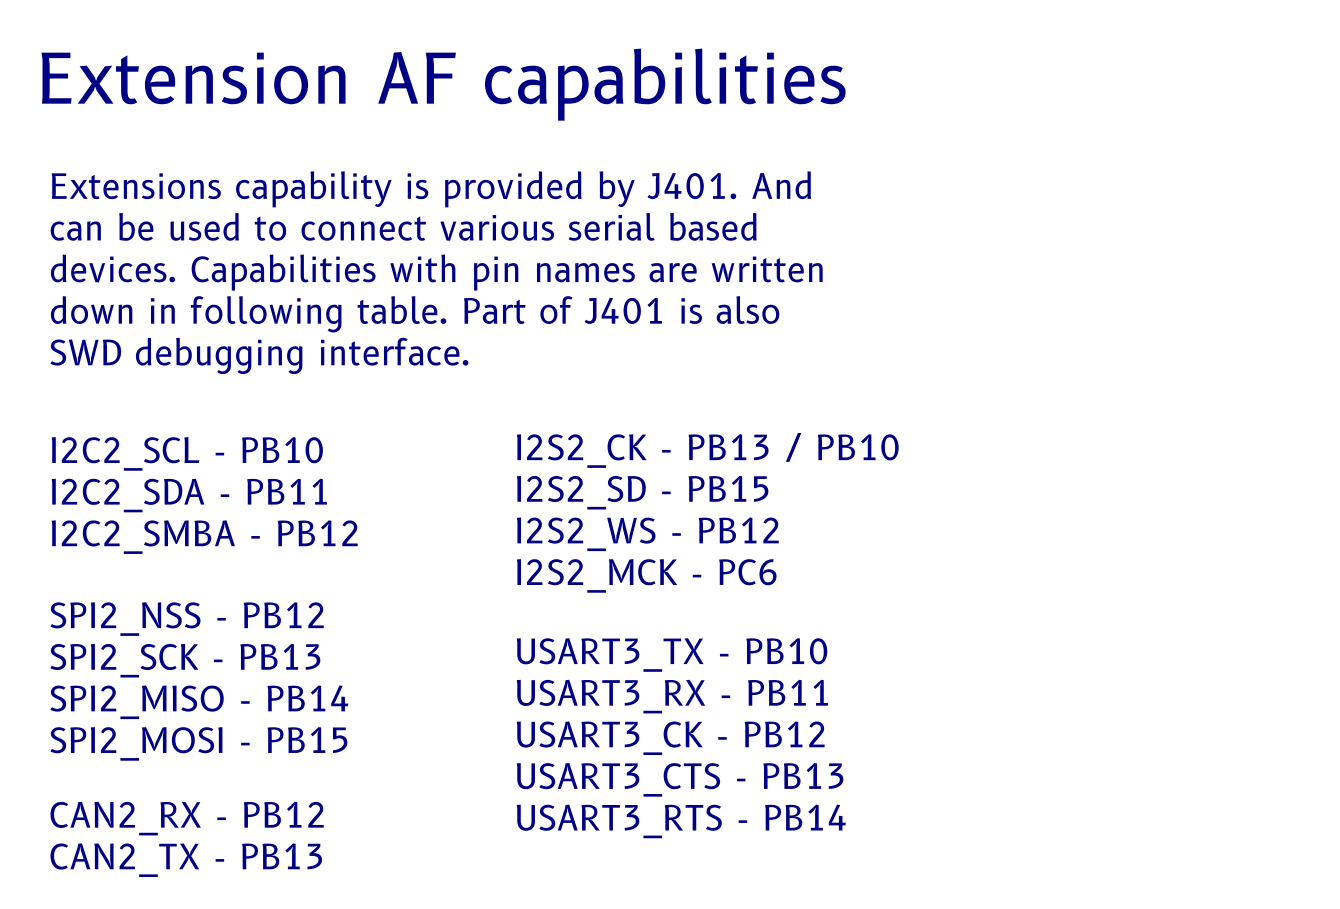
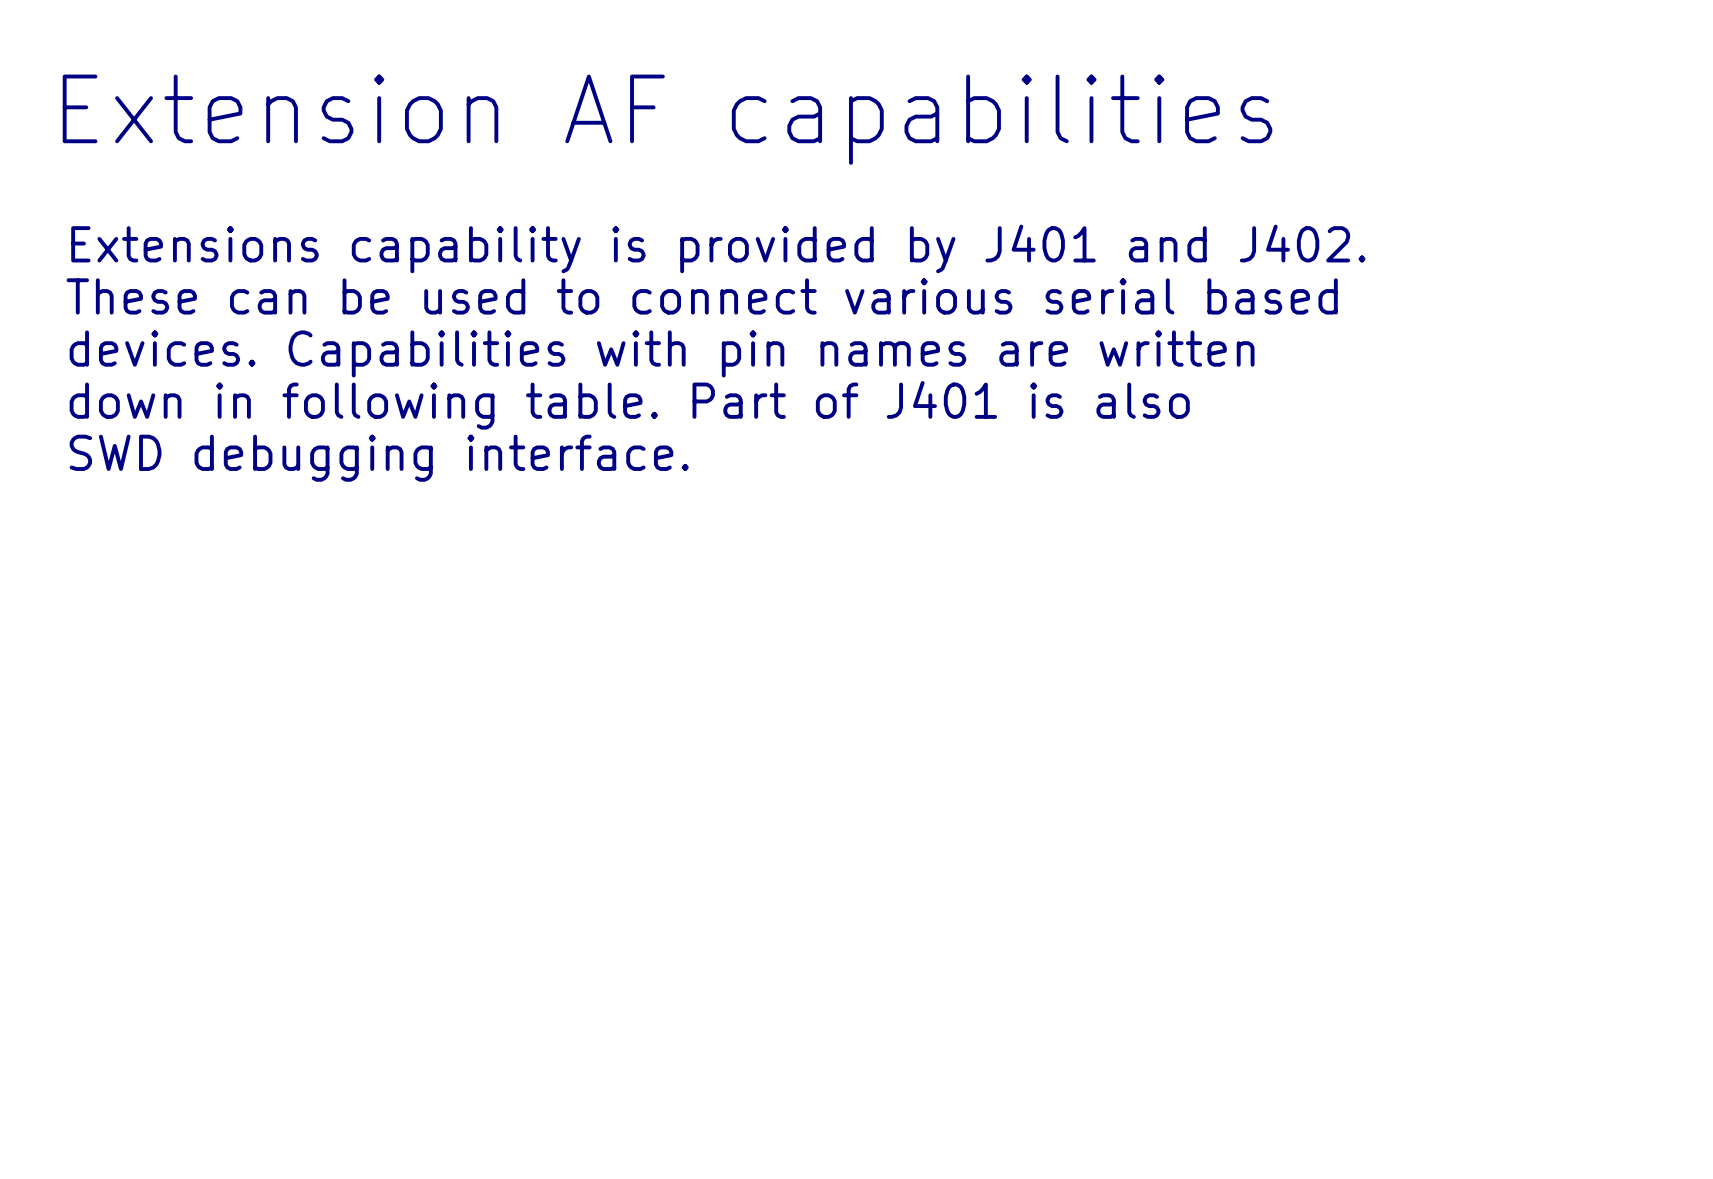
text: Extensions capability is provided by J401. And (431, 189) -> Extensions capability is provided by J401 and J402. (718, 248)
text: can be used to connect various serial based (403, 226) -> These can be used to connect various serial based (702, 296)
text: I2S2_CK - PB13 / PB10 (707, 450) -> none
text: I2C2_SCL - PB10 (187, 453) -> none
text: I2S2_SD - PB15 (642, 492) -> none
text: I2C2_SDA - PB11 (189, 495) -> none
text: I2S2_WS - PB12 (647, 534) -> none
text: I2C2_SMBA - PB12 (204, 537) -> none
text: I2S2_MCK - PC6 (646, 575) -> none
text: SPI2_NSS - PB12 (187, 619) -> none
text: USART3_TX - PB10 (672, 655) -> none
text: SPI2_SCK - PB13 (185, 660) -> none
text: USART3_RX - PB11 (672, 696) -> none
text: SPI2_MISO - PB14 (199, 702) -> none
text: USART3_CK - PB12 (670, 738) -> none
text: SPI2_MOSI - PB15 (198, 743) -> none
text: USART3_CTS - PB13 (680, 779) -> none
text: CAN2_RX - PB12 (187, 818) -> none
text: USART3_RTS - PB14 (681, 821) -> none
text: CAN2_TX - PB13 (186, 860) -> none

